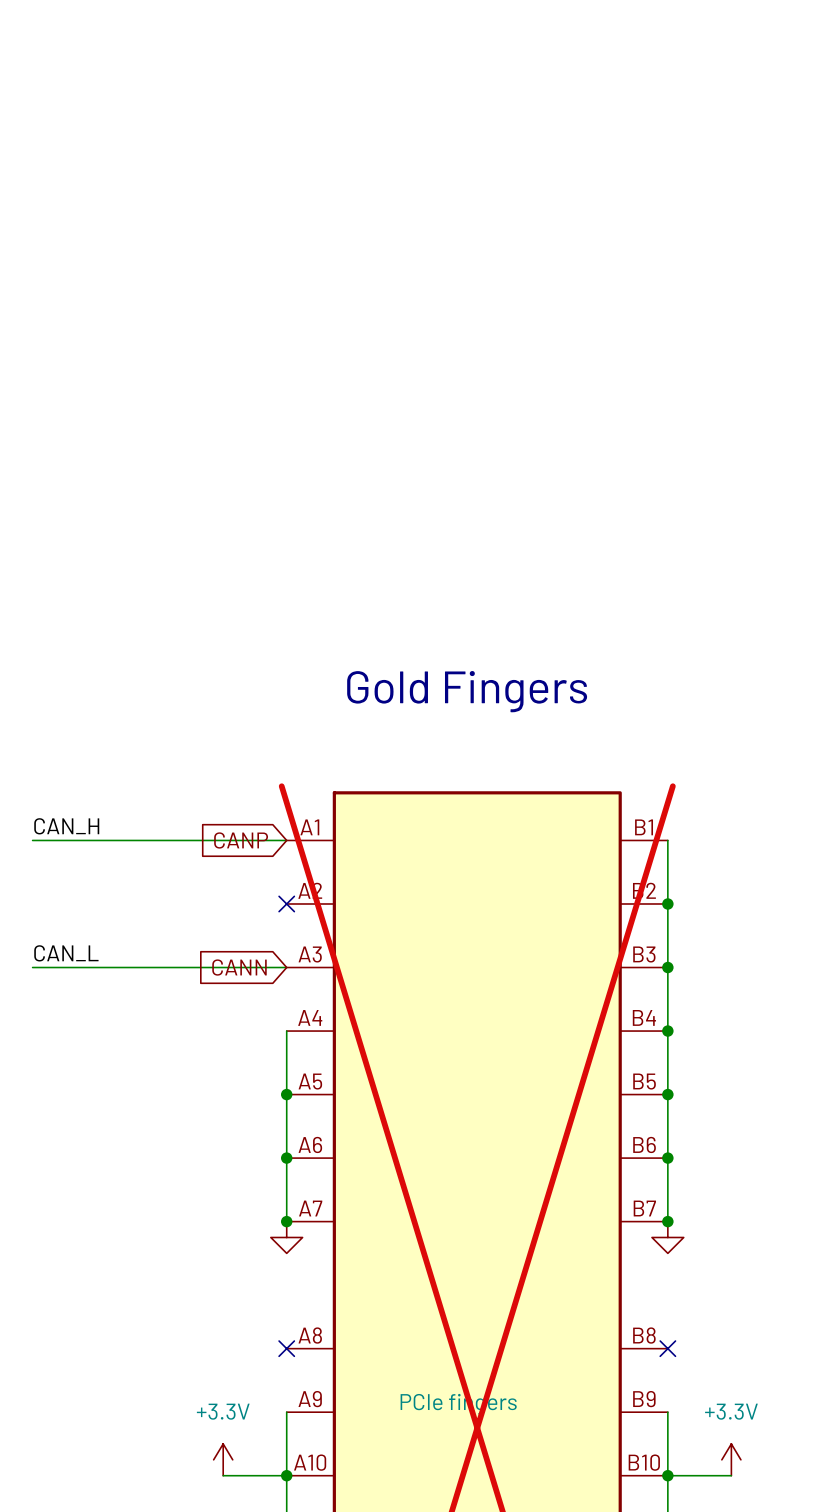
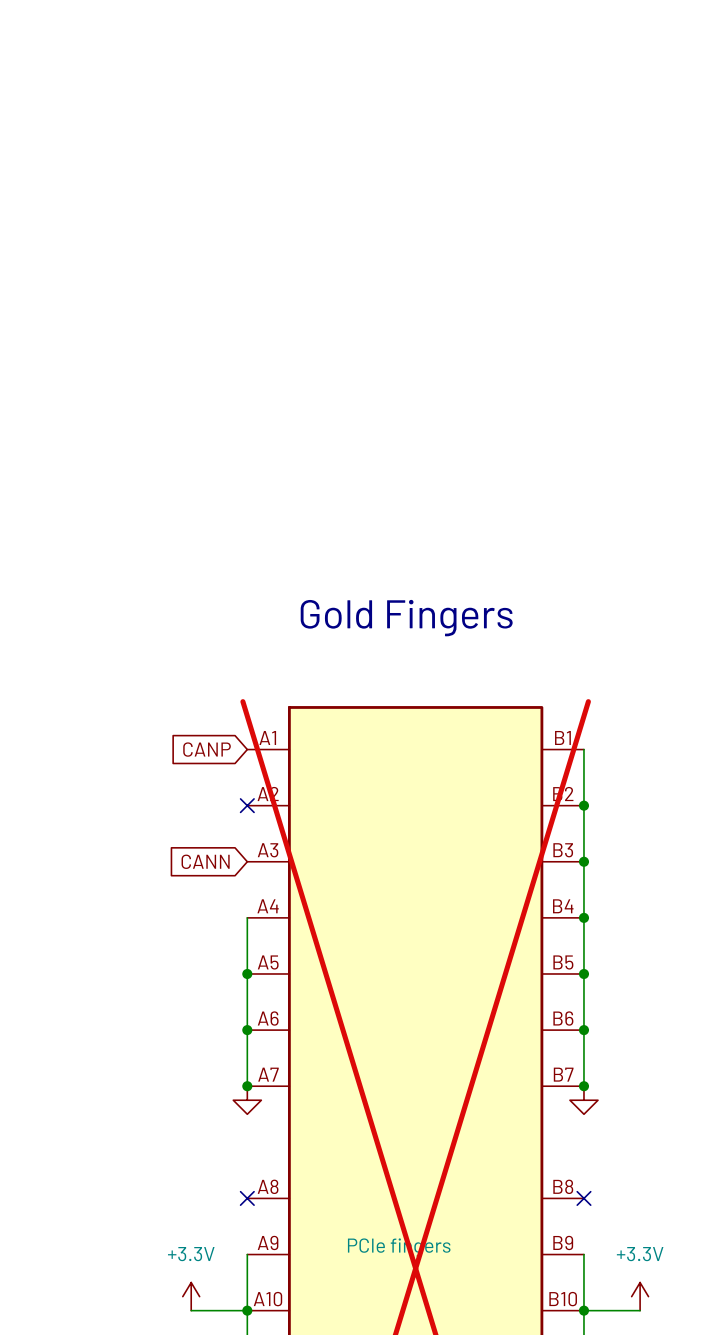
label: CAN_H (66, 826) -> none
wire: (32, 840) (286, 840) -> none
label: CAN_L (66, 953) -> none
wire: (32, 967) (286, 967) -> none

